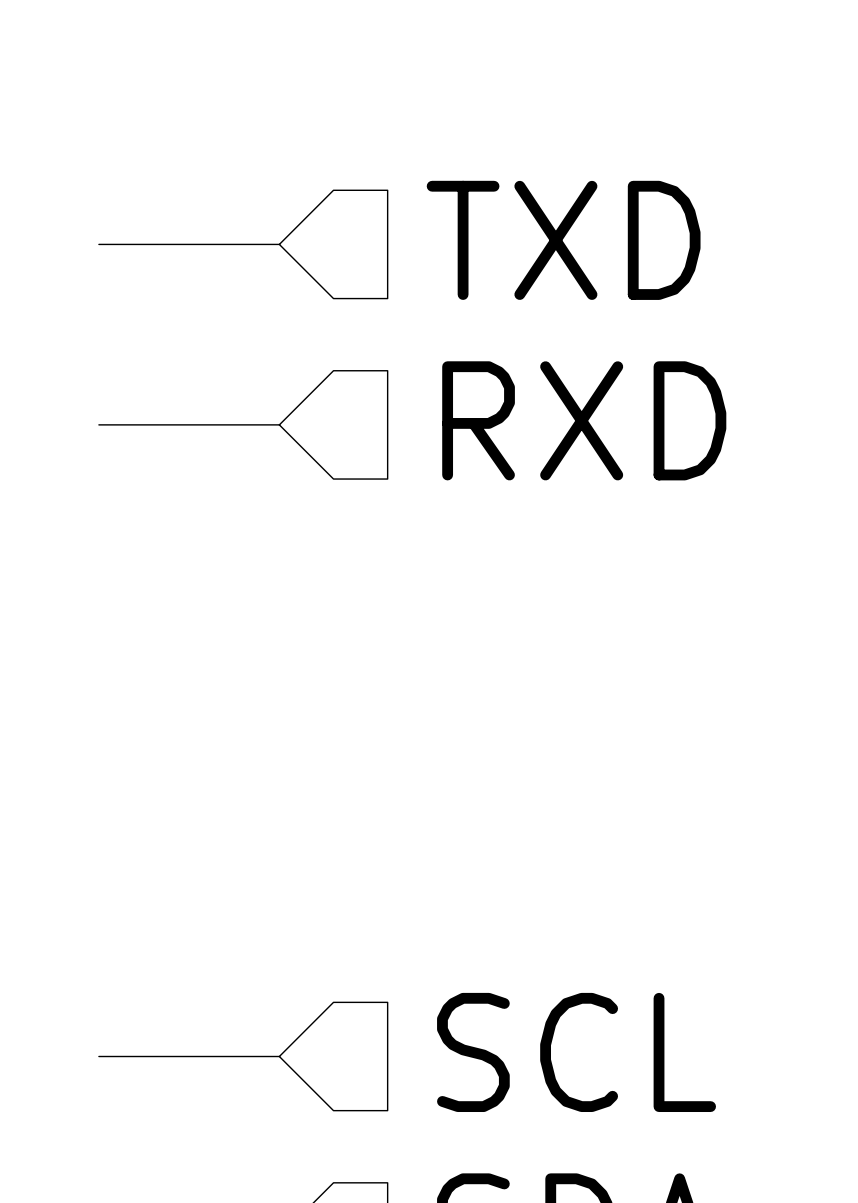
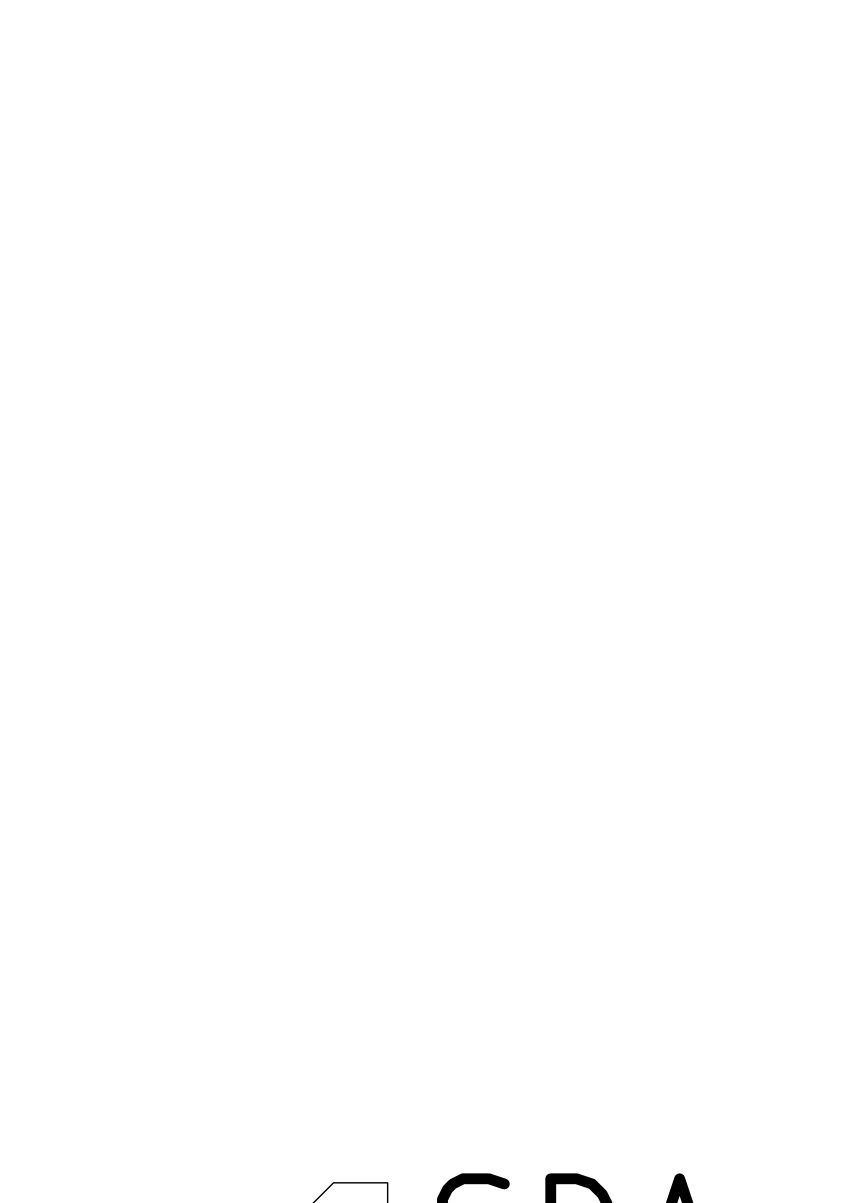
hierarchical label: TXD (563, 240) -> none
wire: (98, 244) (279, 244) -> none
hierarchical label: RXD (584, 420) -> none
wire: (98, 424) (279, 424) -> none
hierarchical label: SCL (576, 1052) -> none
wire: (98, 1056) (279, 1056) -> none

